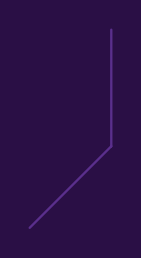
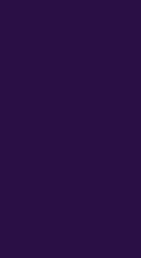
track: (111, 29) (111, 146) (29, 227) -> none

